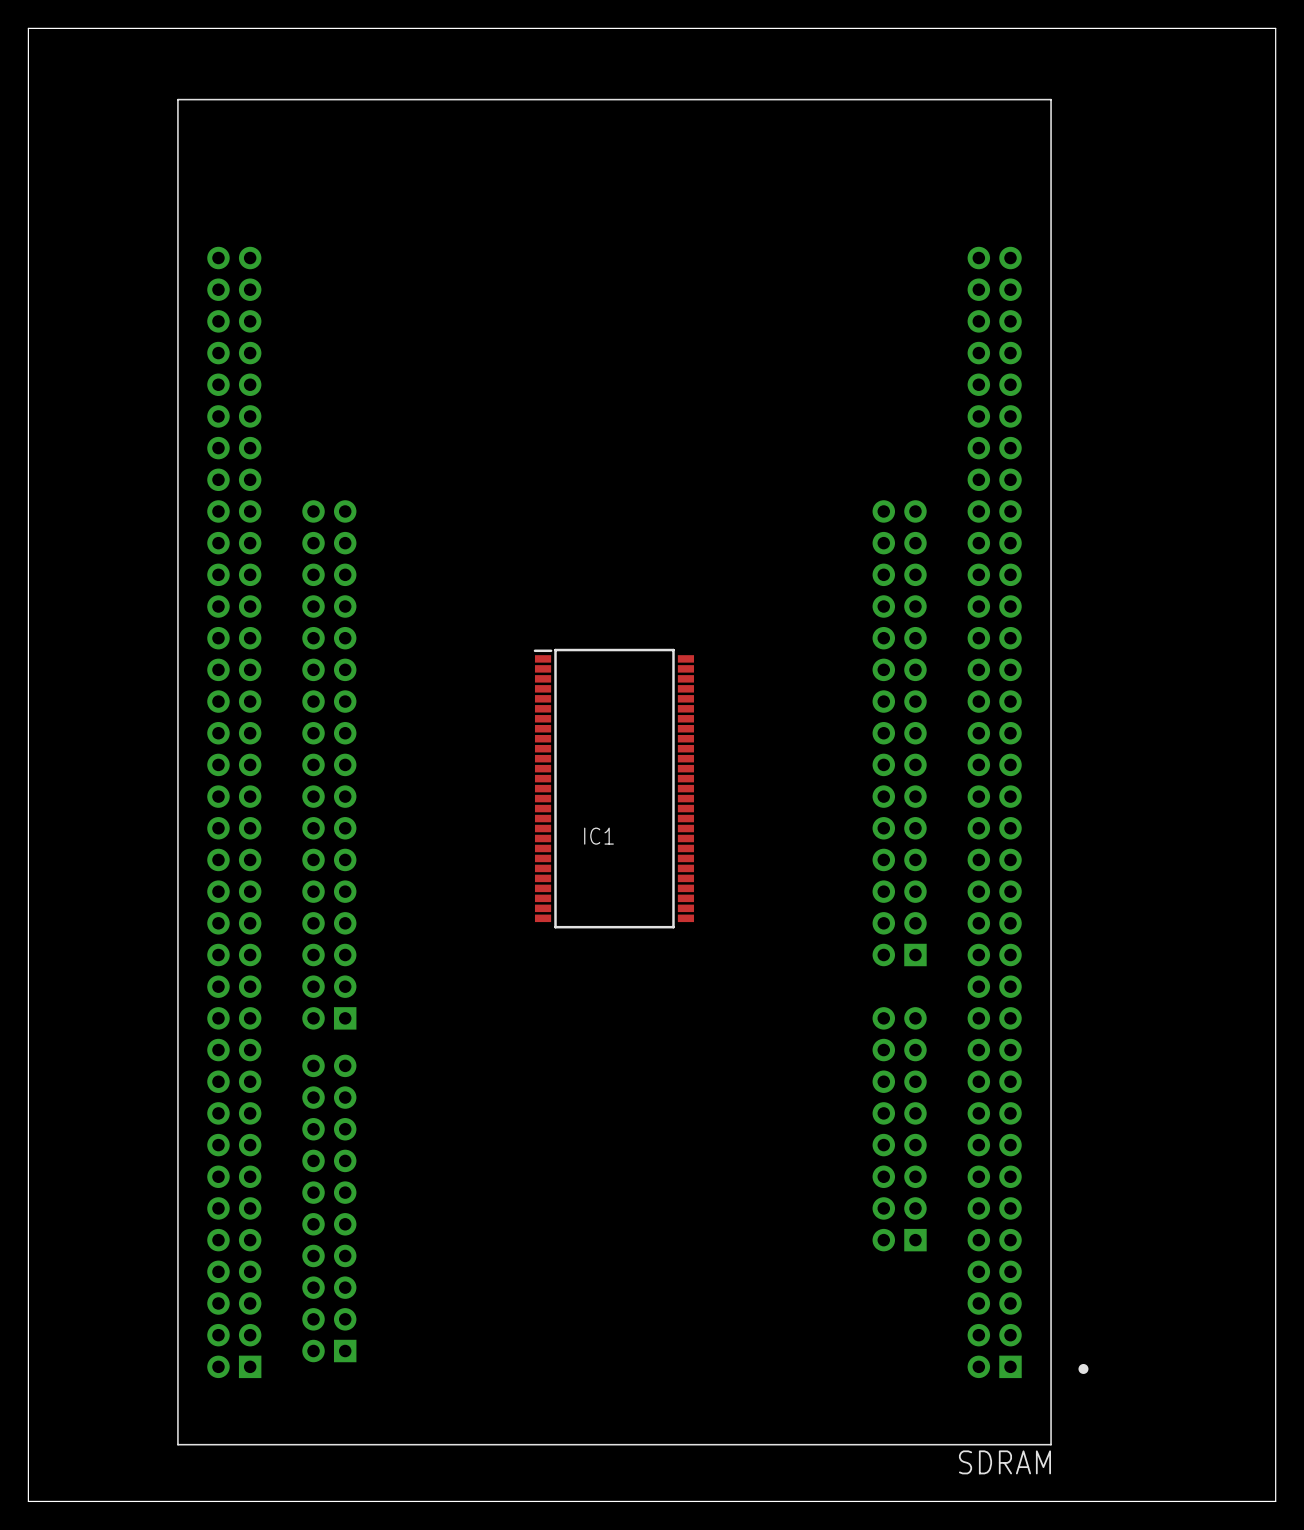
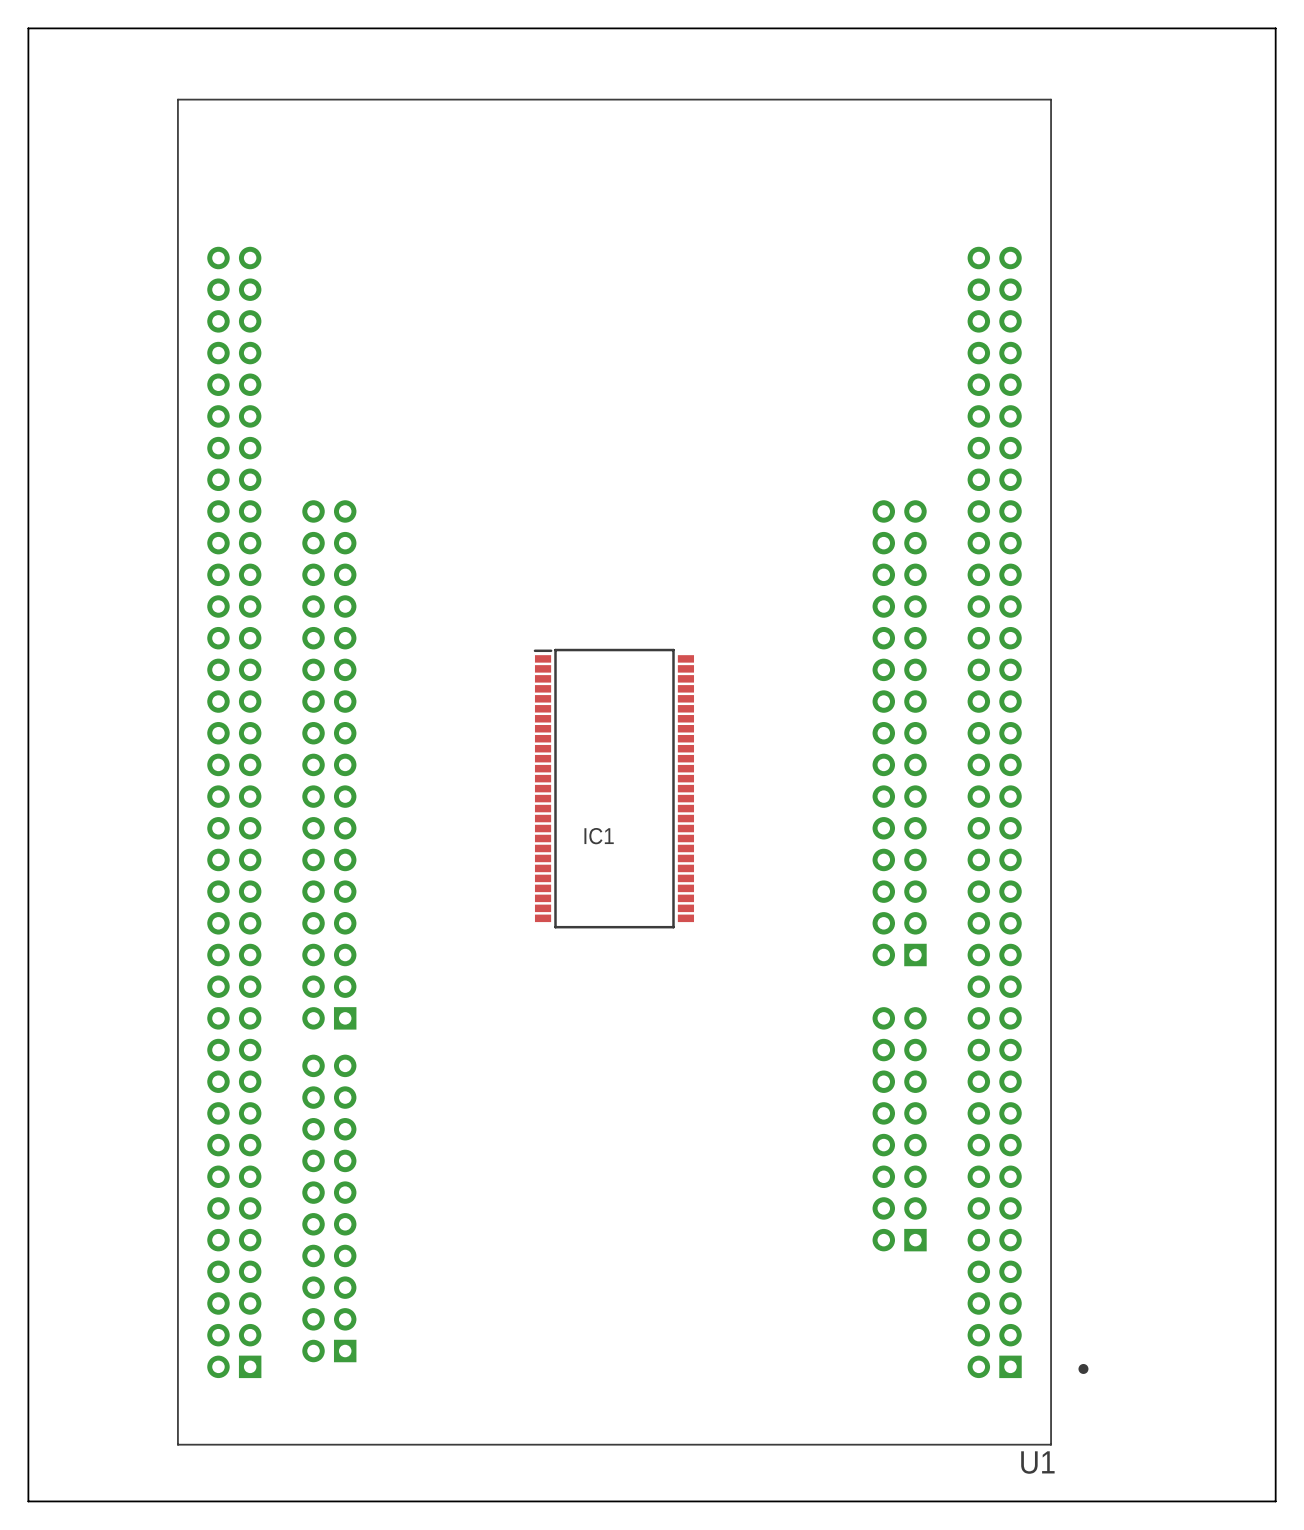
SDRAM name: SDRAM (1004, 1462) -> U1 (1037, 1462)

